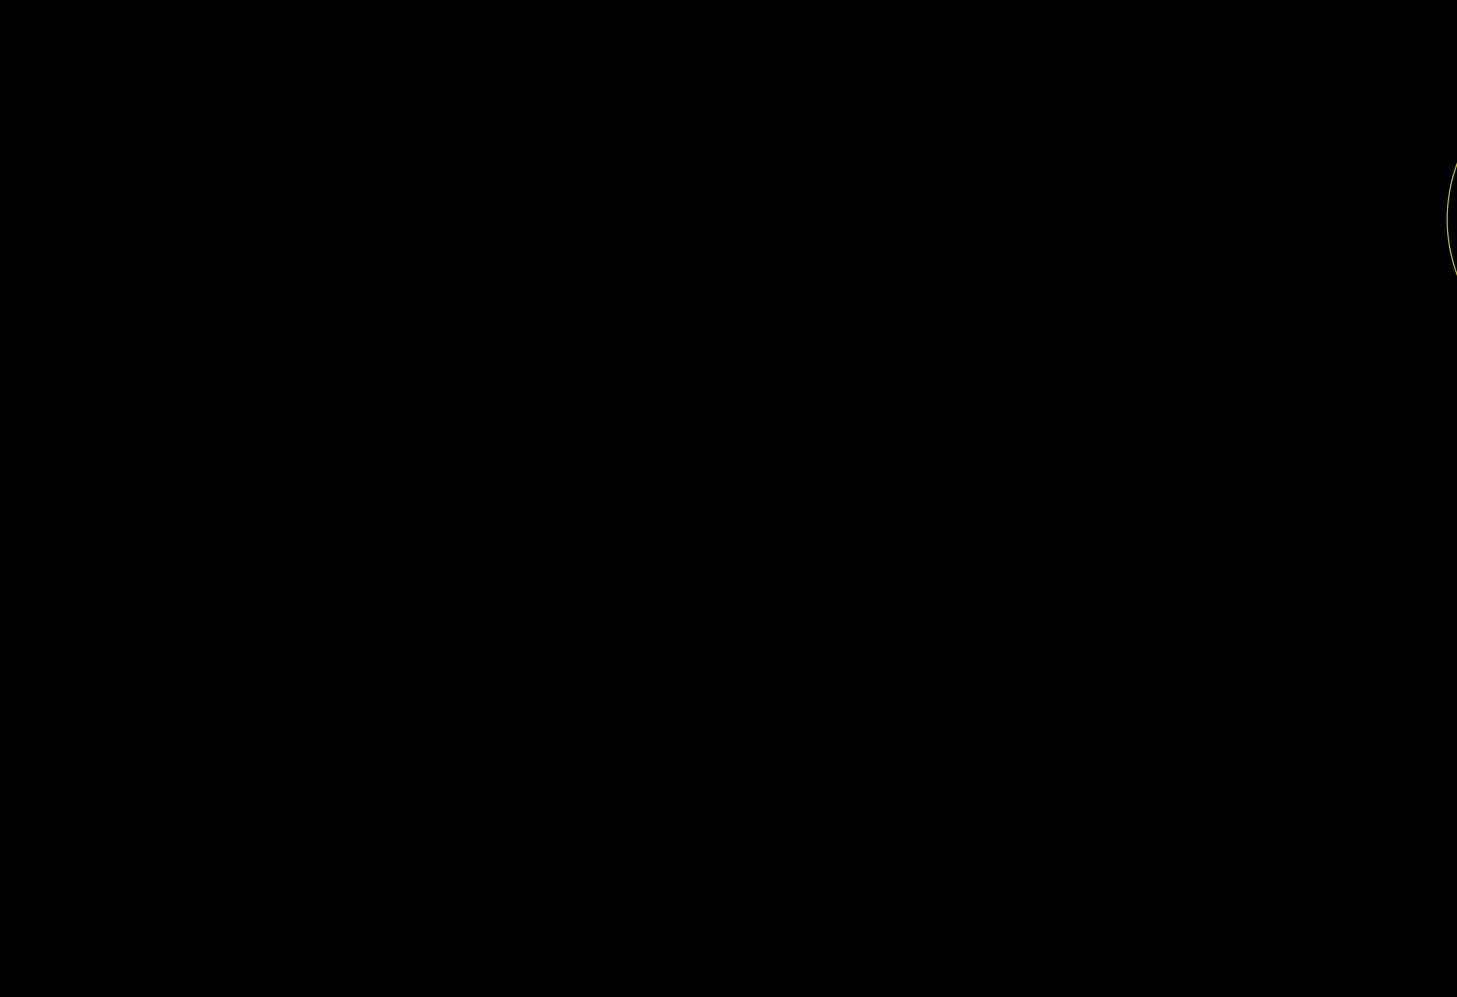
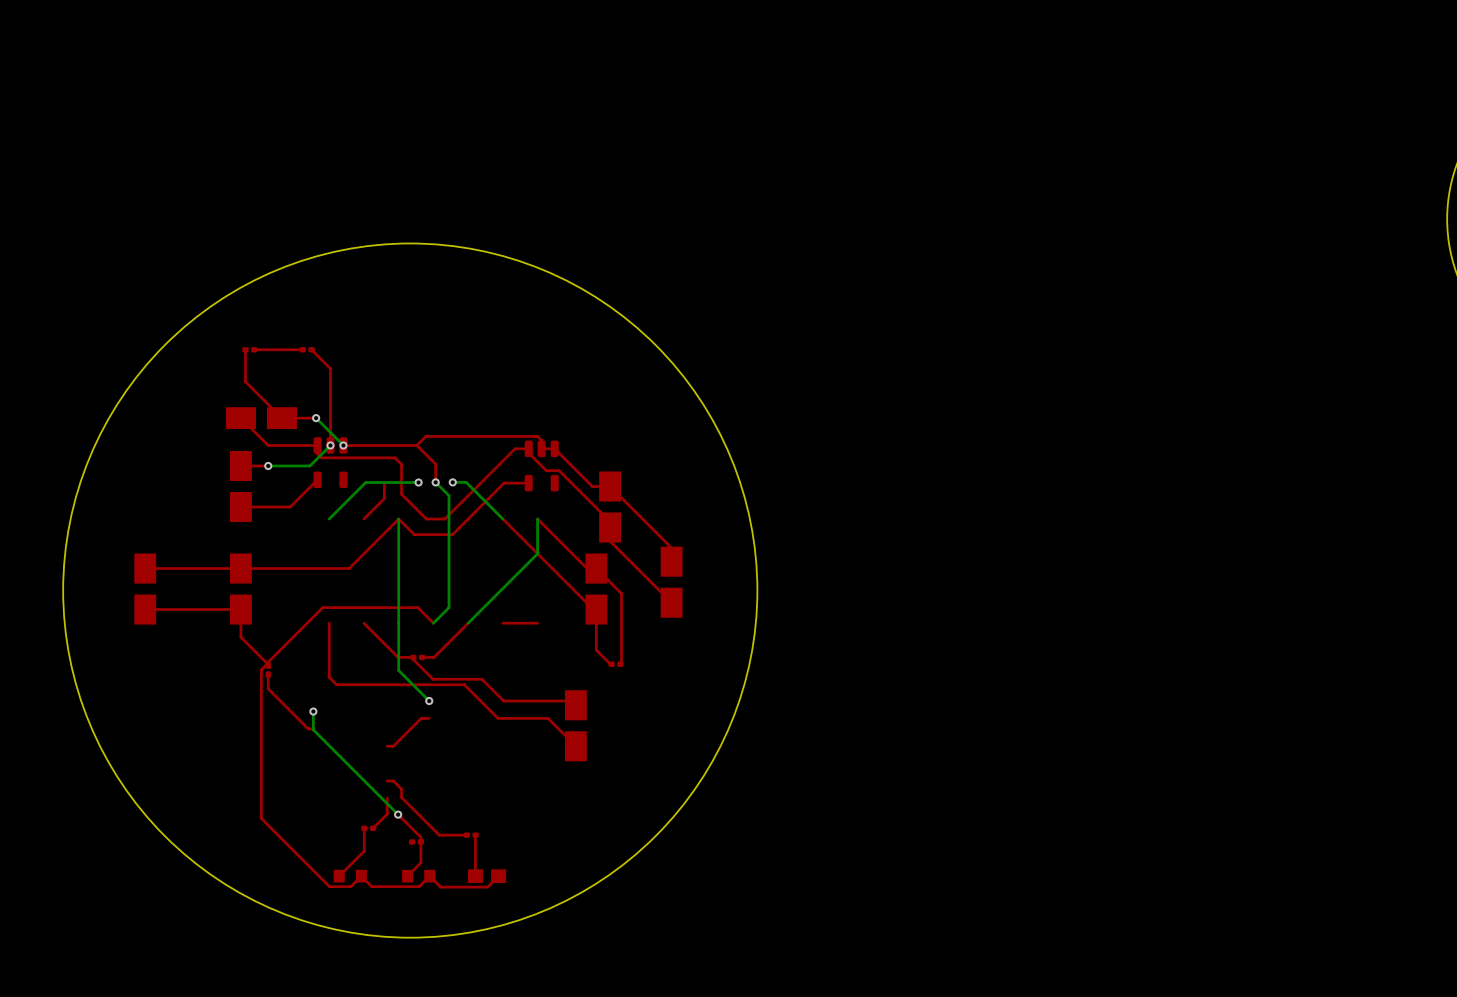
round board edge: none -> [62, 243, 758, 939]
top track: none -> (245, 349) (245, 381) (281, 418) (316, 418)
part: none -> (249, 349)
top track: none -> (302, 349) (254, 349)
part: none -> (307, 349)
top track: none -> (311, 349) (330, 368) (330, 449)
top track: none -> (240, 418) (268, 445) (317, 445) (317, 453) (321, 457) (394, 457) (401, 464) (401, 494) (426, 519) (444, 519) (515, 448) (528, 448) (528, 453) (546, 470) (559, 470) (610, 521) (610, 541) (671, 602)
part: none -> (261, 418)
bottom track: none -> (316, 418) (343, 445)
via: none -> (316, 418)
bottom track: none -> (330, 445) (309, 465) (268, 465)
via: none -> (330, 445)
via: none -> (343, 445)
top track: none -> (416, 445) (425, 436) (537, 436) (541, 440) (541, 448) (554, 448) (592, 486) (610, 486) (671, 548) (671, 561)
top track: none -> (416, 445) (343, 445)
top track: none -> (416, 445) (435, 464) (435, 482)
part: none -> (330, 462)
top track: none -> (268, 465) (240, 465)
via: none -> (268, 465)
part: none -> (541, 465)
top track: none -> (317, 479) (290, 507) (240, 507)
top track: none -> (384, 482) (384, 498) (363, 519)
bottom track: none -> (418, 482) (365, 482) (329, 519)
via: none -> (418, 482)
bottom track: none -> (435, 482) (449, 495) (449, 607) (433, 623)
via: none -> (435, 482)
bottom track: none -> (452, 482) (466, 482) (502, 519)
via: none -> (452, 482)
top track: none -> (528, 483) (504, 483) (452, 534) (414, 534) (398, 519) (349, 568) (145, 568)
part: none -> (240, 486)
part: none -> (610, 507)
bottom track: none -> (398, 519) (398, 670) (429, 701)
top track: none -> (502, 519) (593, 609) (596, 609) (596, 650) (610, 664)
top track: none -> (537, 519) (587, 568) (596, 568) (621, 593) (621, 664)
bottom track: none -> (537, 519) (537, 553) (468, 623)
part: none -> (671, 582)
part: none -> (145, 589)
part: none -> (240, 589)
part: none -> (596, 589)
top track: none -> (145, 609) (240, 609) (240, 637) (268, 664)
top track: none -> (329, 623) (329, 677) (336, 684) (464, 684) (497, 718) (548, 718) (575, 746)
top track: none -> (363, 623) (398, 657) (412, 657) (433, 679) (482, 679) (503, 701) (571, 701) (575, 705)
top track: none -> (433, 623) (417, 607) (322, 607) (268, 662) (268, 665) (261, 669) (261, 818) (329, 886) (350, 886) (361, 876) (371, 886) (419, 886) (429, 876) (440, 887) (487, 887) (498, 876)
top track: none -> (468, 623) (433, 657) (423, 657)
top track: none -> (537, 623) (502, 623)
part: none -> (417, 657)
part: none -> (615, 664)
part: none -> (268, 670)
top track: none -> (268, 675) (268, 689) (308, 728) (313, 728)
via: none -> (429, 701)
bottom track: none -> (313, 711) (313, 729) (398, 814)
via: none -> (313, 711)
top track: none -> (429, 718) (421, 718) (393, 746) (387, 746)
part: none -> (575, 725)
top track: none -> (387, 781) (393, 781) (401, 789) (401, 797) (439, 835) (466, 835)
top track: none -> (387, 798) (387, 814) (373, 828)
top track: none -> (398, 814) (420, 837) (420, 862) (407, 876)
via: none -> (398, 814)
top track: none -> (364, 828) (364, 851) (339, 876)
part: none -> (368, 828)
part: none -> (471, 835)
top track: none -> (475, 835) (475, 876)
part: none -> (416, 841)
part: none -> (350, 876)
part: none -> (418, 876)
part: none -> (487, 876)

